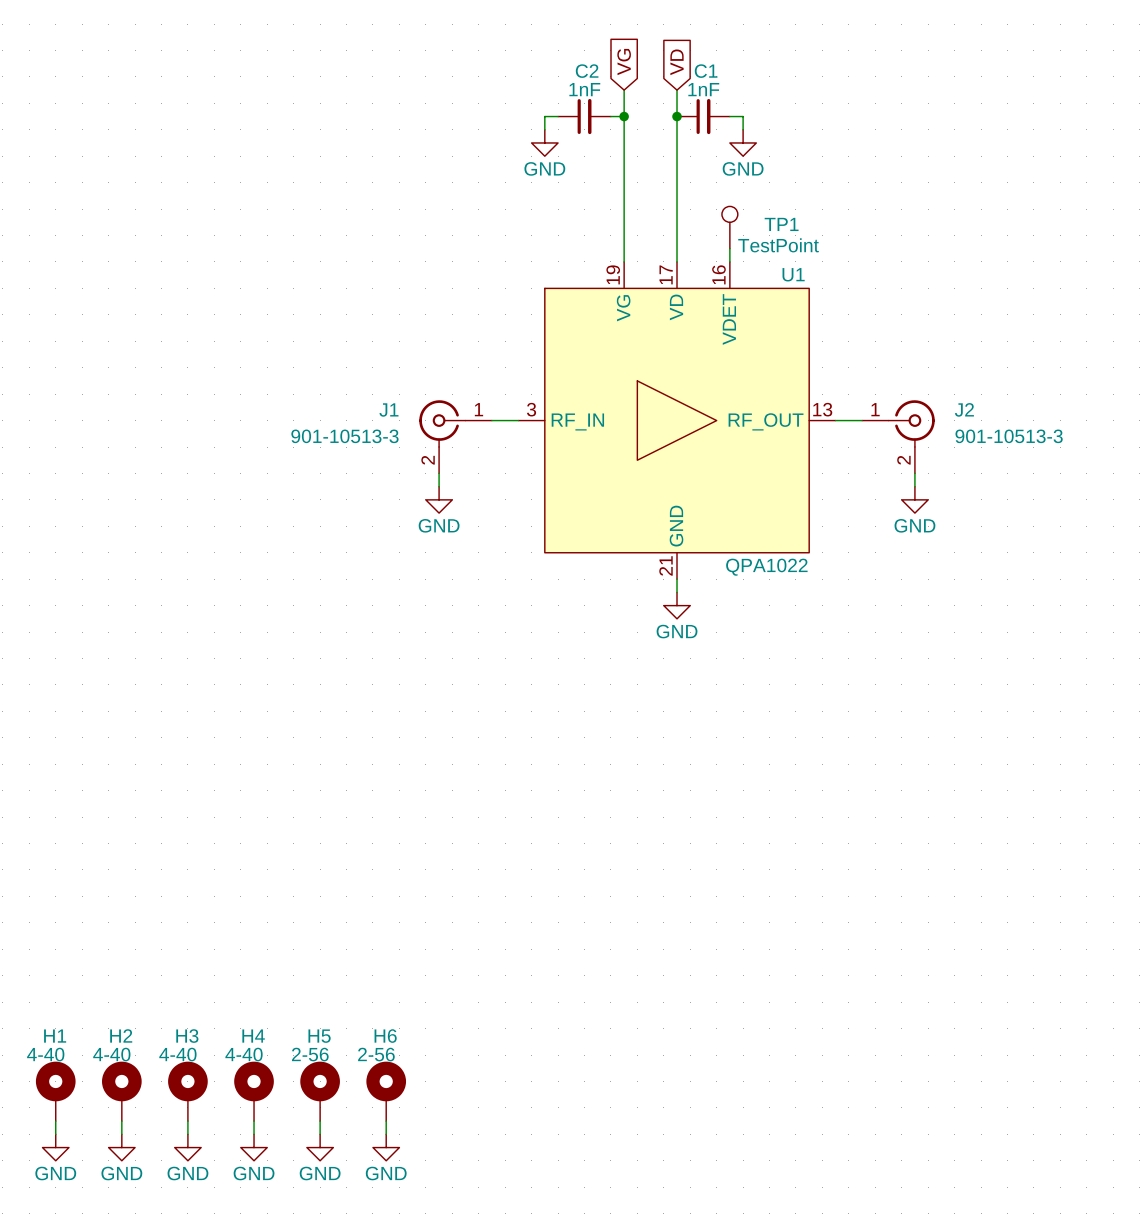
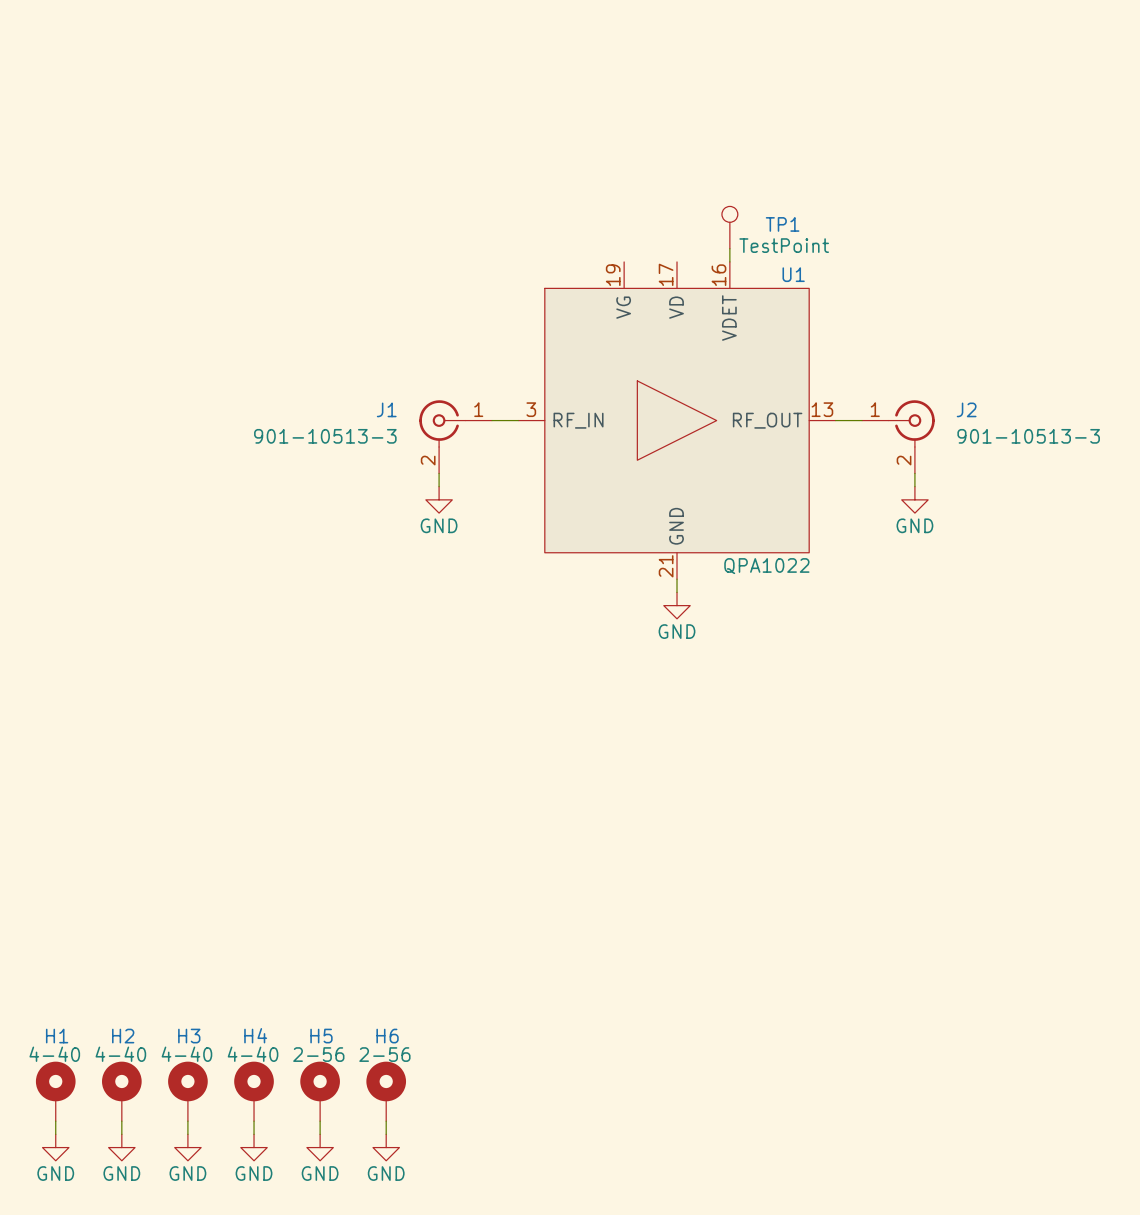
global label: VG (624, 62) -> none
global label: VD (677, 62) -> none
wire: (624, 90) (624, 261) -> none
wire: (677, 90) (677, 261) -> none
wire: (558, 116) (544, 116) (544, 129) -> none
C2: 1nF (584, 116) -> none
wire: (610, 116) (624, 116) -> none
junction: (624, 116) -> none
junction: (677, 116) -> none
C1: 1nF (703, 116) -> none
wire: (729, 116) (743, 116) (743, 129) -> none
power symbol: GND (544, 142) -> none
power symbol: GND (743, 142) -> none

